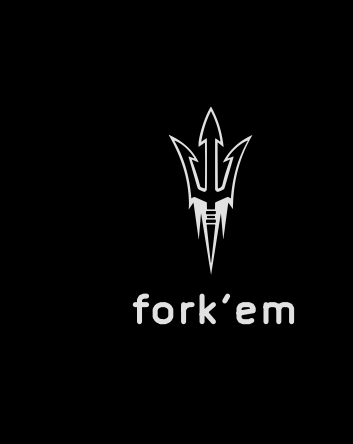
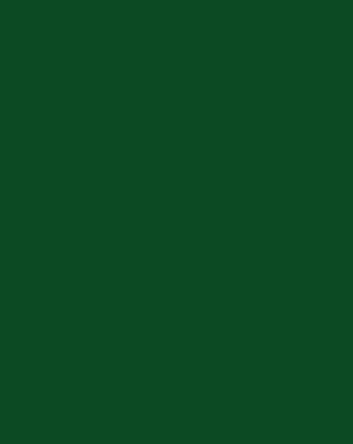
drawing: [168, 106, 253, 275] -> none
text: fork'em (213, 308) -> none

